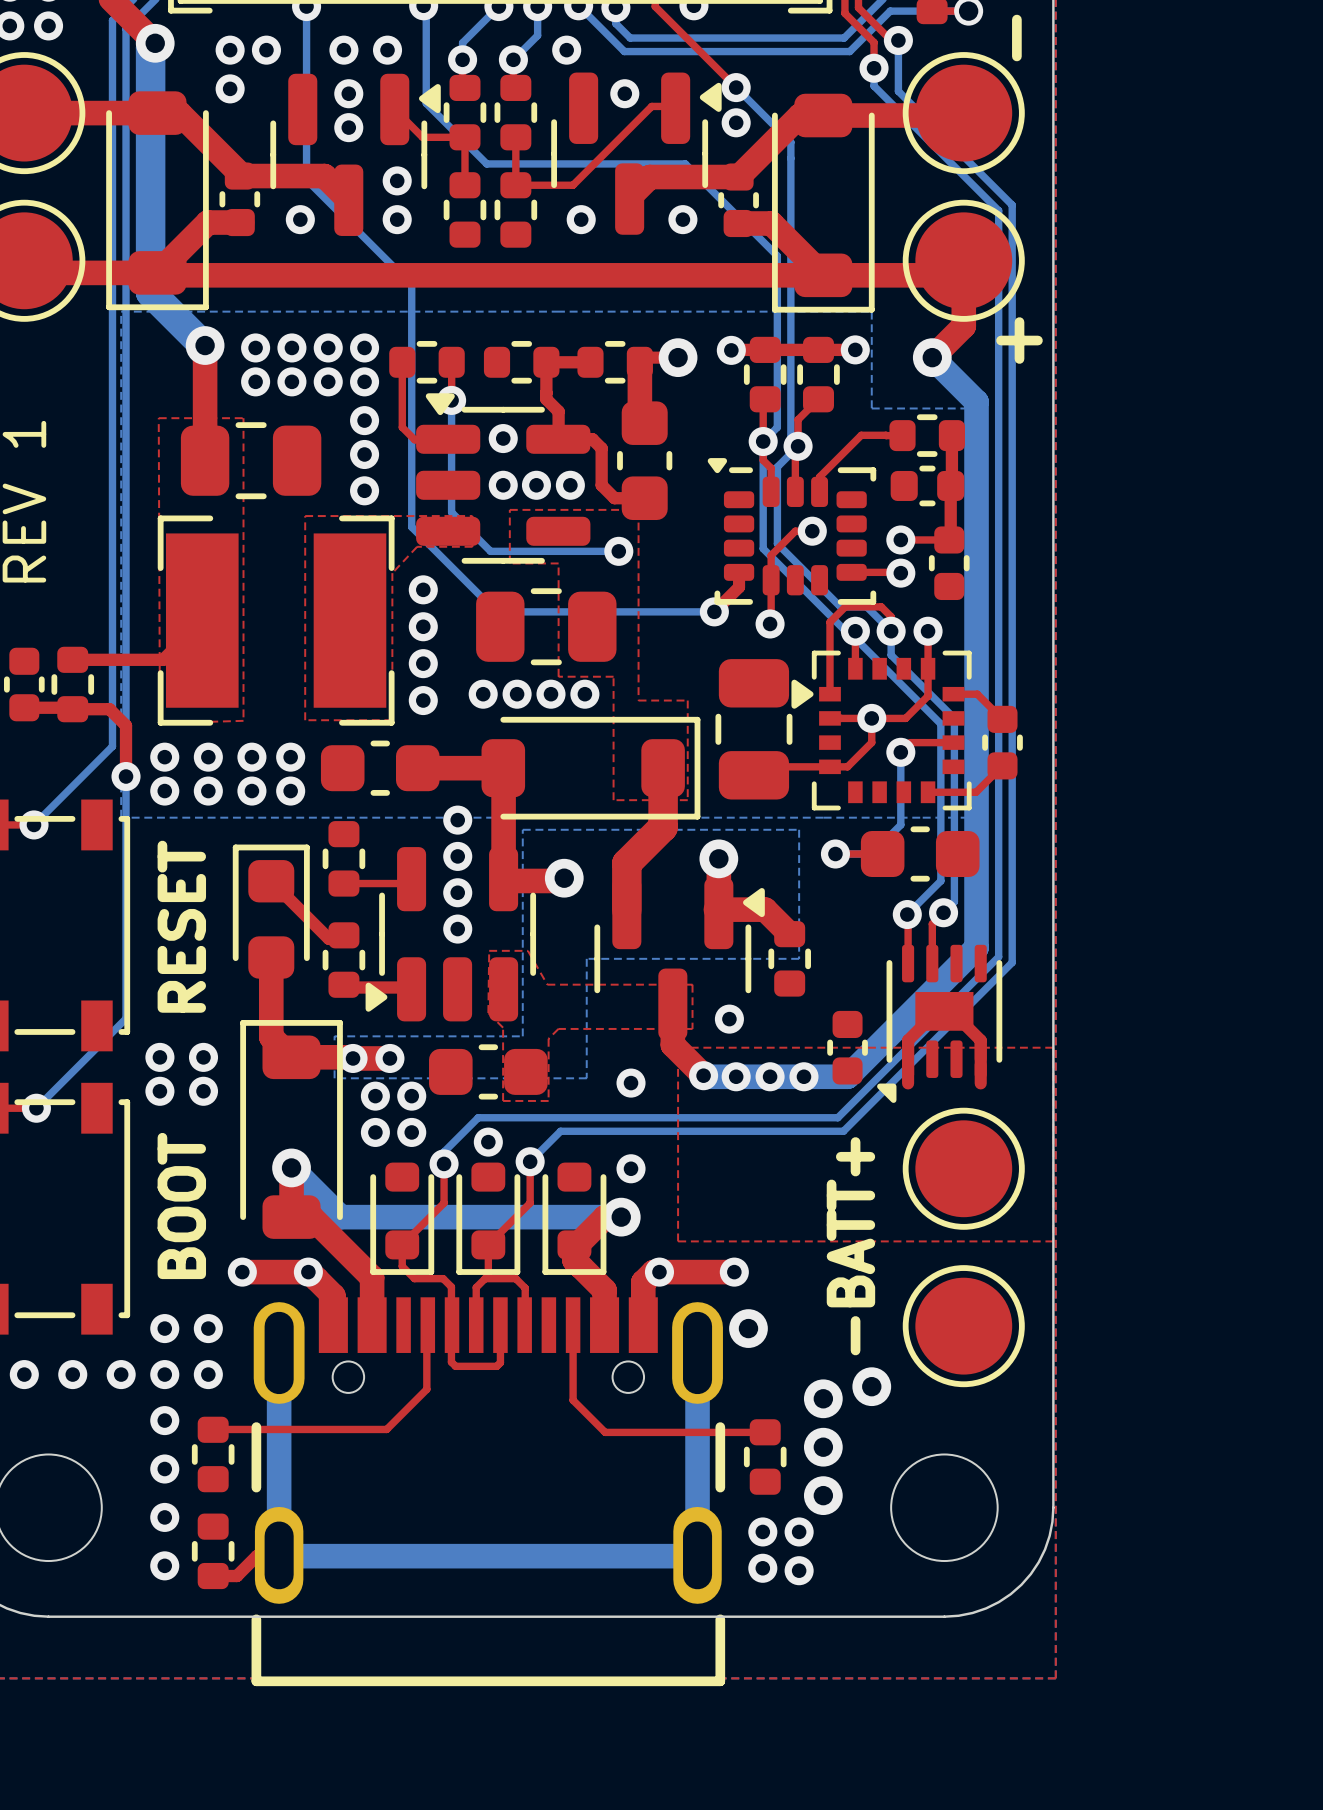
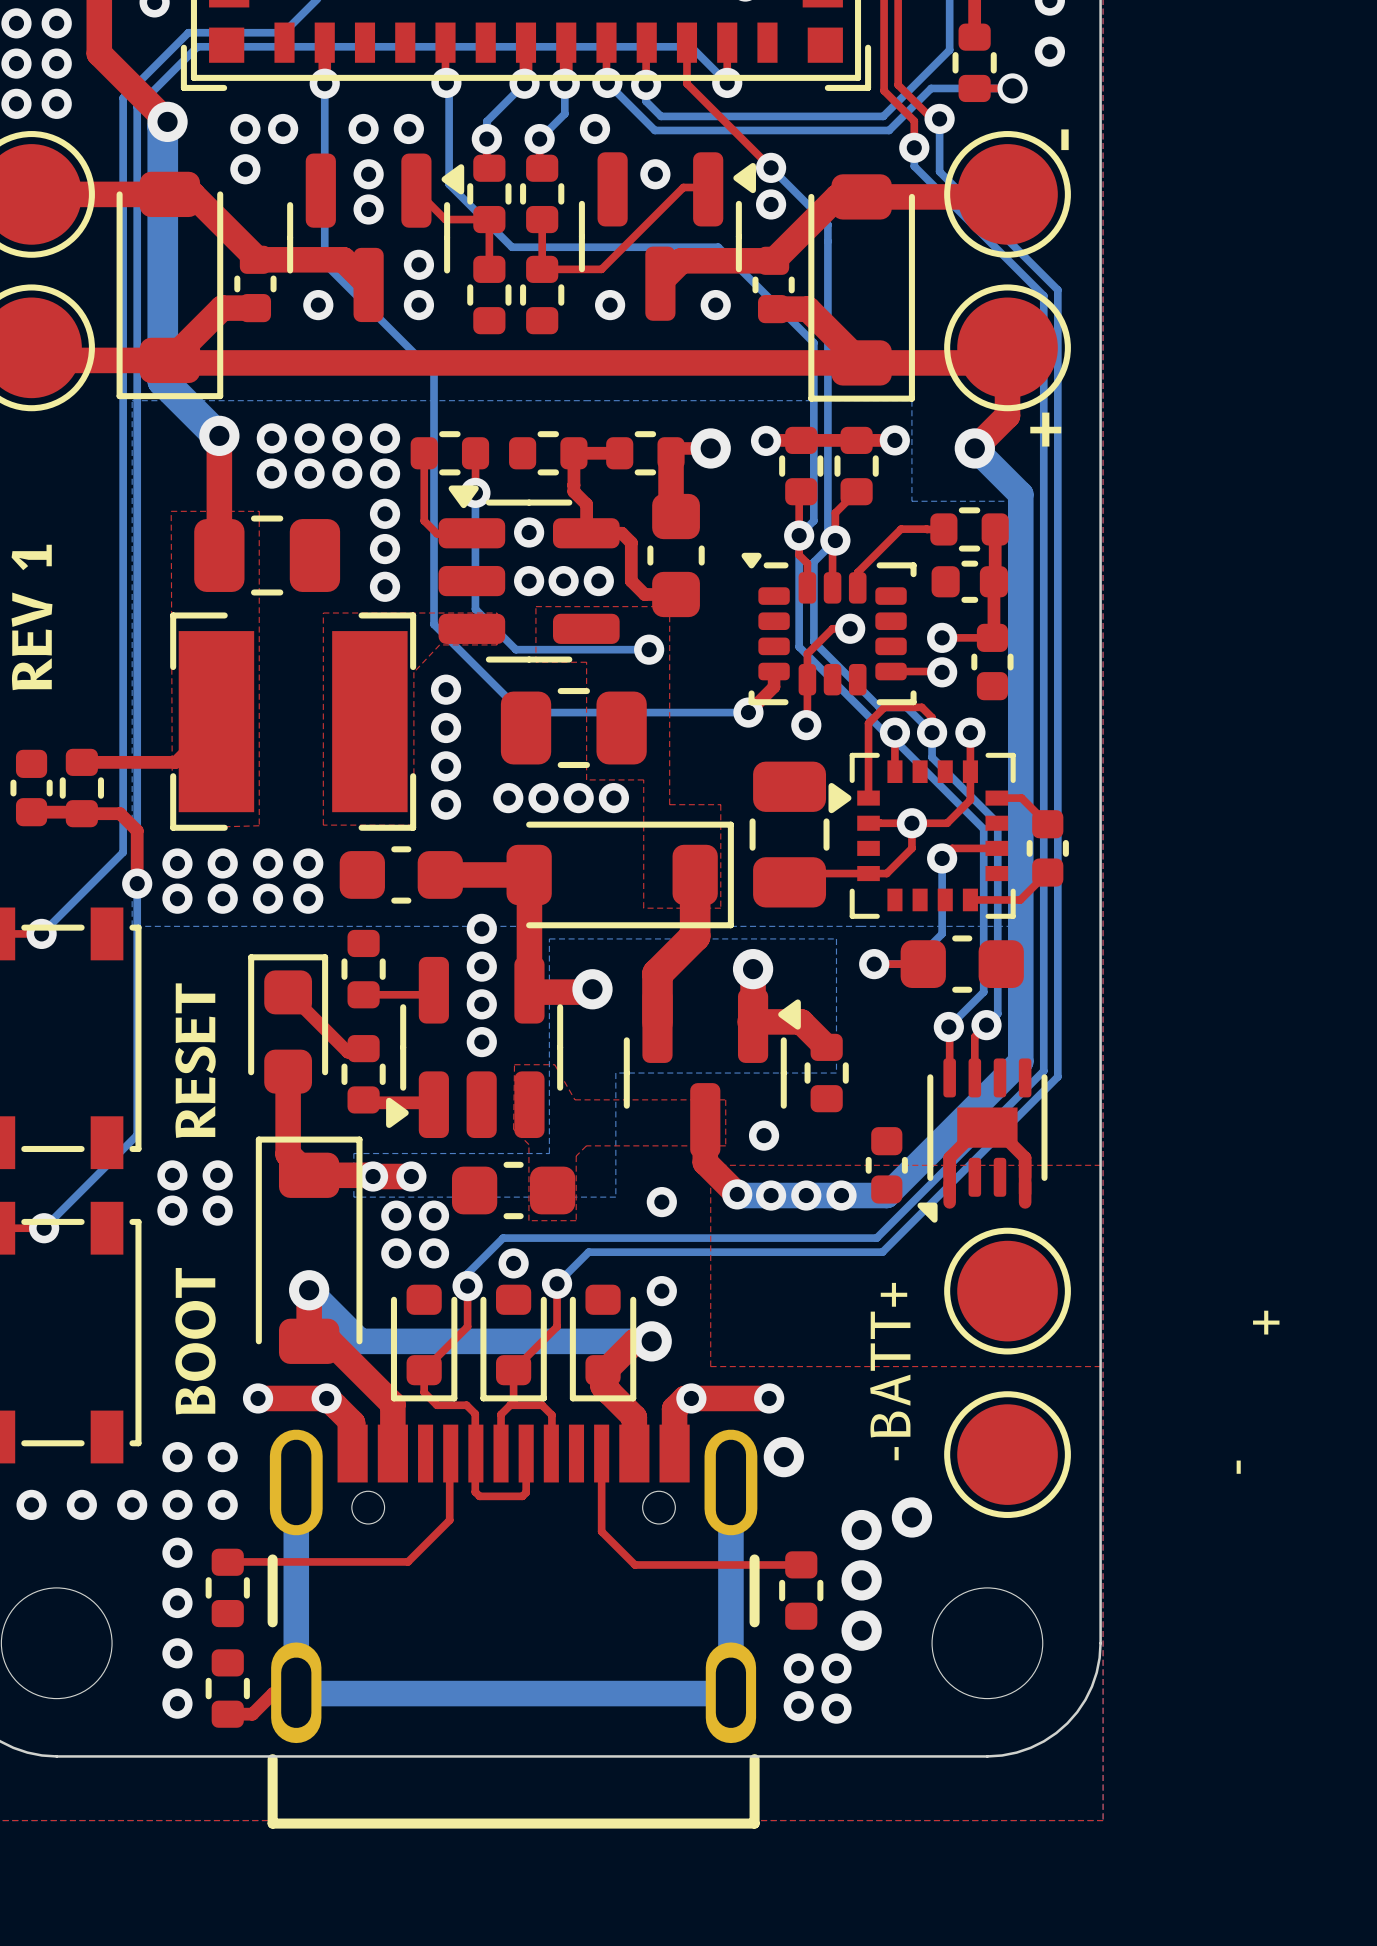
text: none -> + (1266, 1322)
text: none -> - (1238, 1467)

